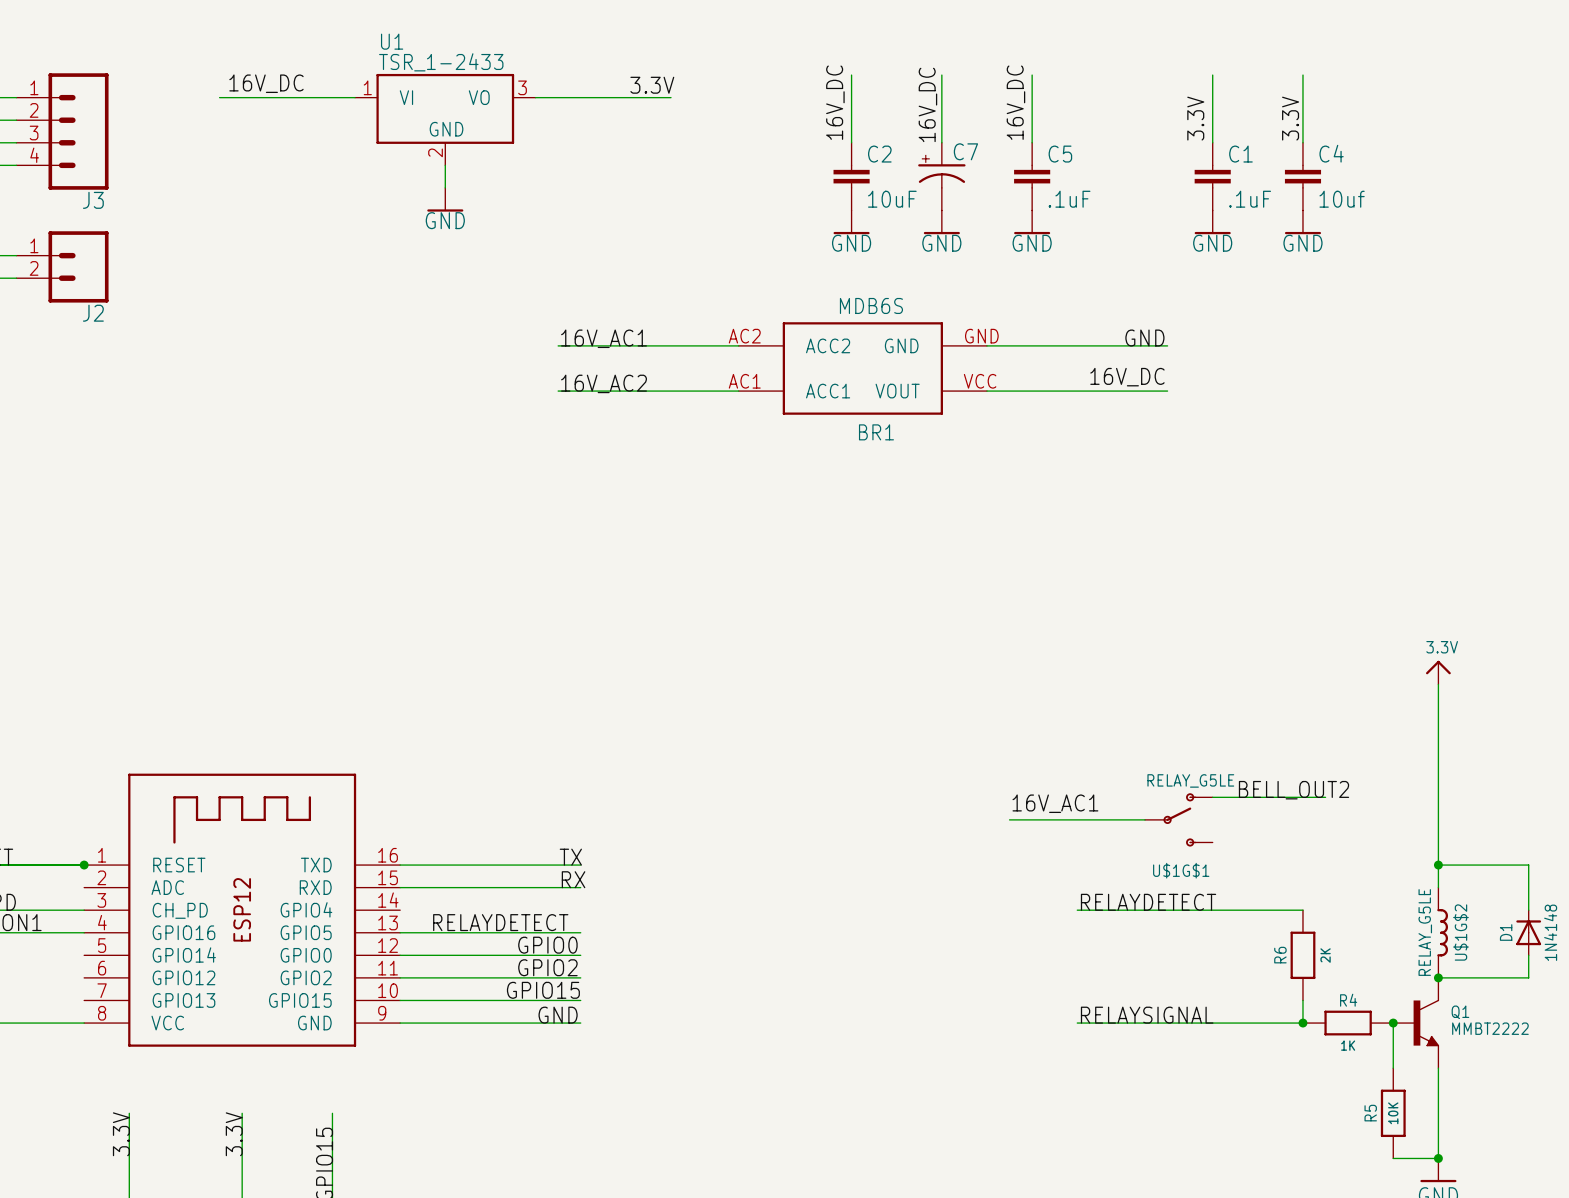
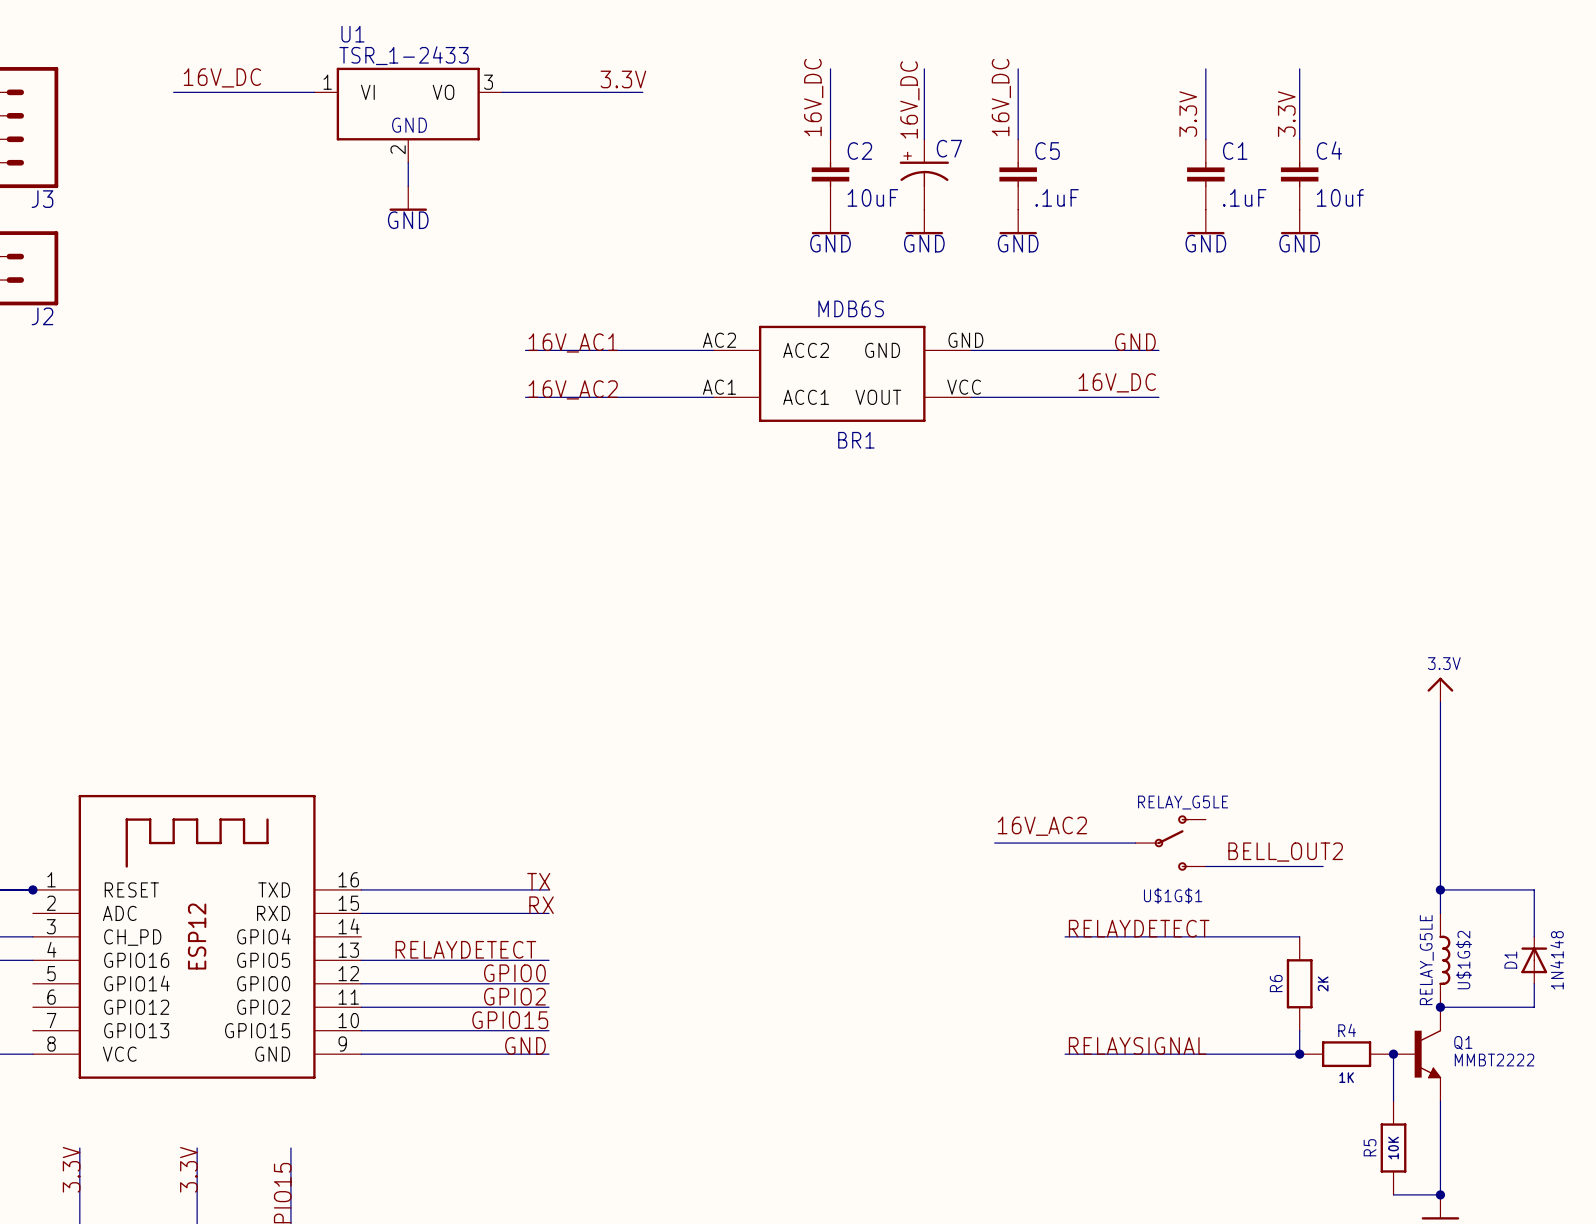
label position: BELL_OUT2 (1294, 790) -> BELL_OUT2 (1285, 852)
wire: (1212, 797) (1325, 797) -> (1205, 866) (1323, 866)
label: 16V_AC1 (1055, 803) -> 16V_AC2 (1042, 826)

